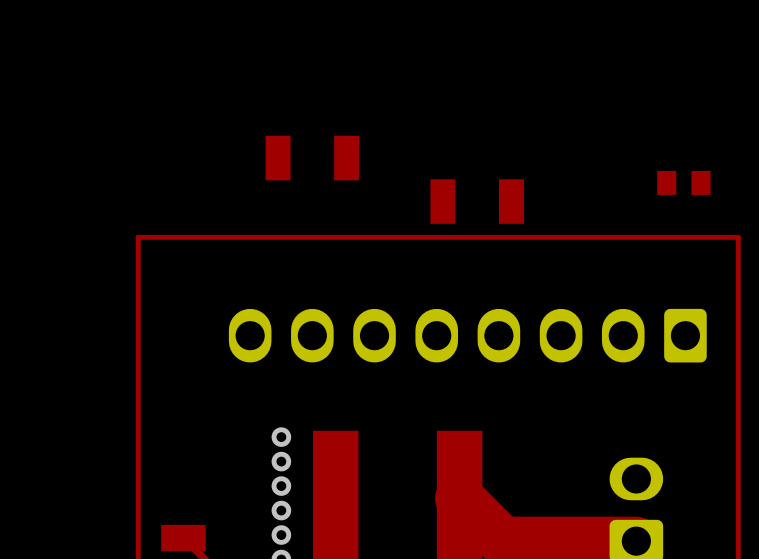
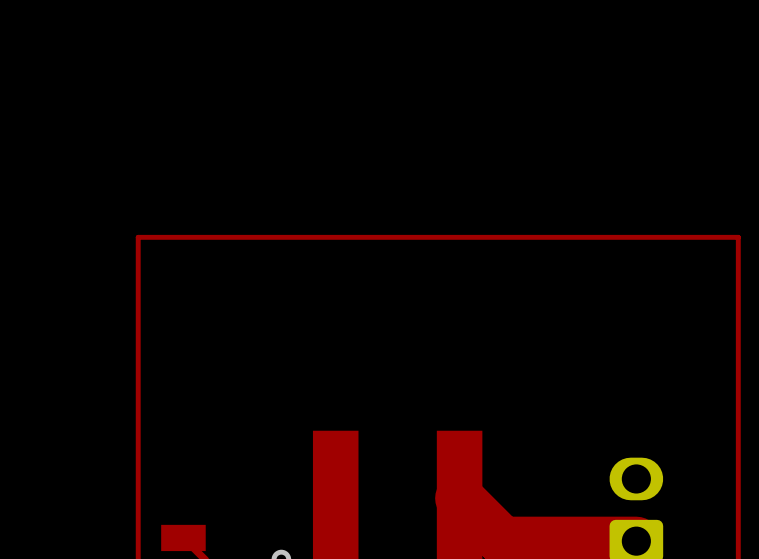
part: (312, 158) -> none
part: (683, 182) -> none
part: (477, 201) -> none
part: (467, 335) -> none
via: (281, 437) -> none
via: (281, 461) -> none
via: (281, 486) -> none
via: (281, 510) -> none
via: (281, 535) -> none

